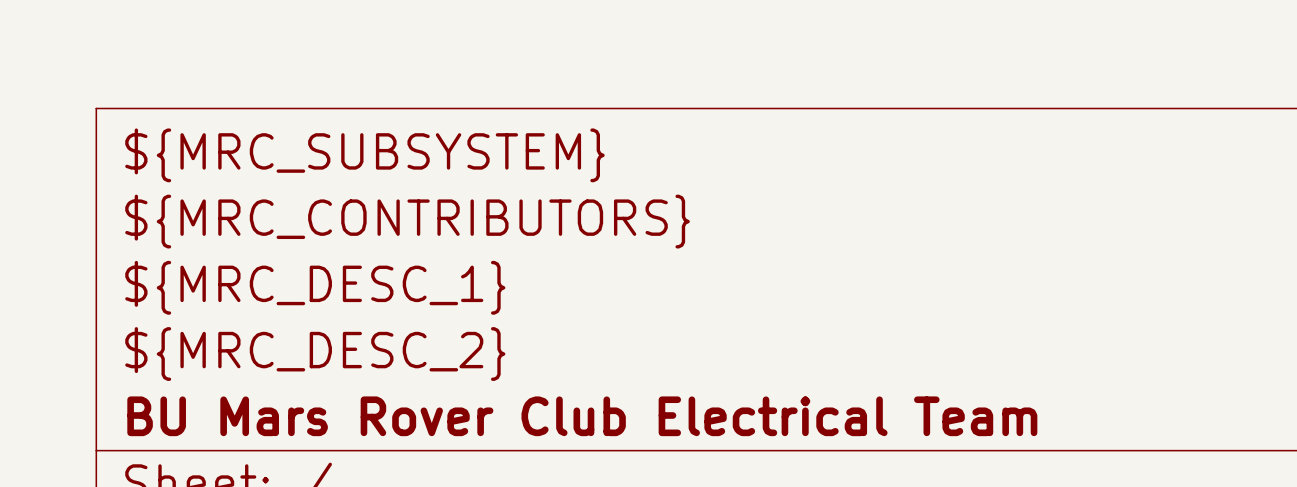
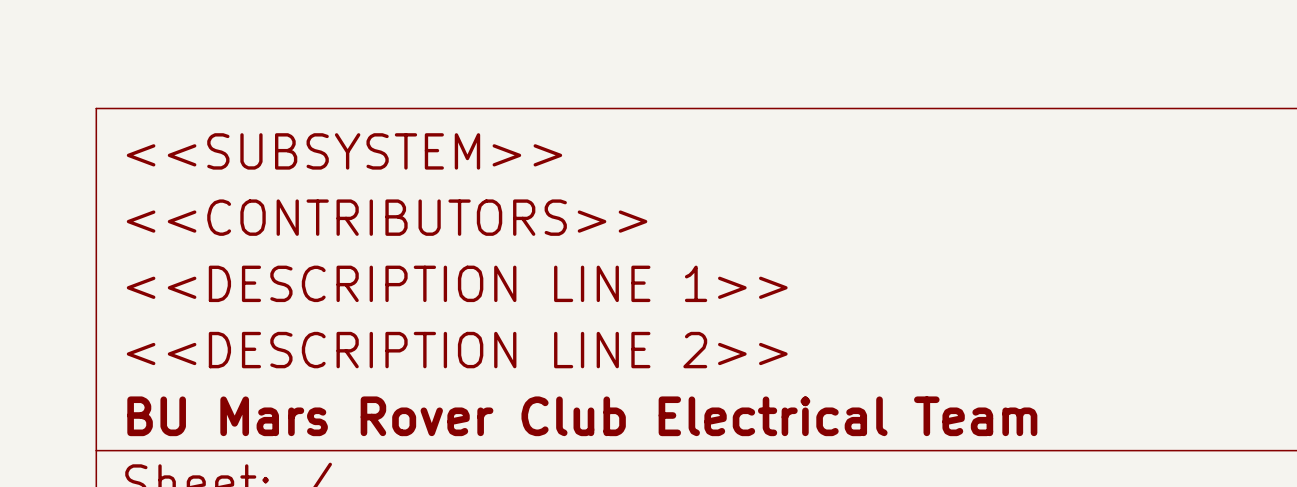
title block: ${MRC_SUBSYSTEM} (364, 155) -> <<SUBSYSTEM>> (344, 151)
title block: ${MRC_CONTRIBUTORS} (407, 221) -> <<CONTRIBUTORS>> (387, 217)
title block: ${MRC_DESC_1} (315, 287) -> <<DESCRIPTION LINE 1>> (457, 283)
title block: ${MRC_DESC_2} (315, 354) -> <<DESCRIPTION LINE 2>> (457, 350)

